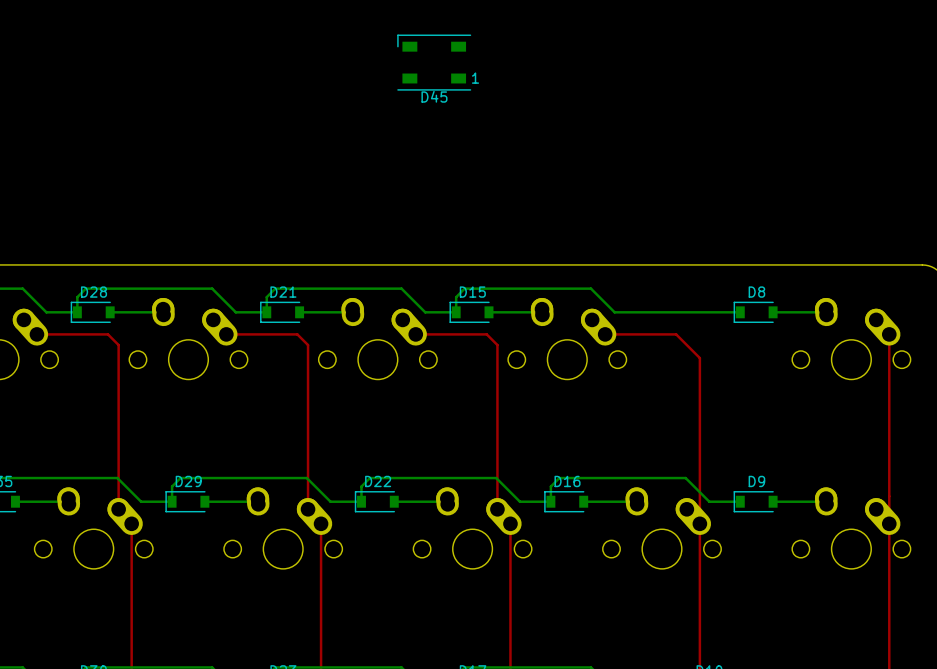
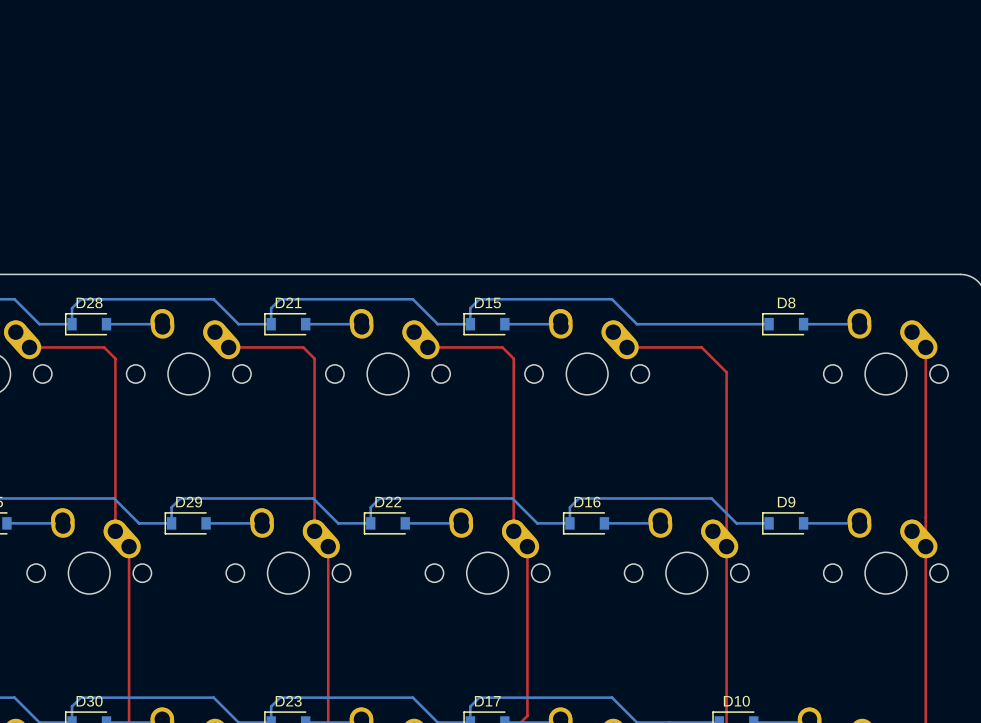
D45: (434, 62) -> none

